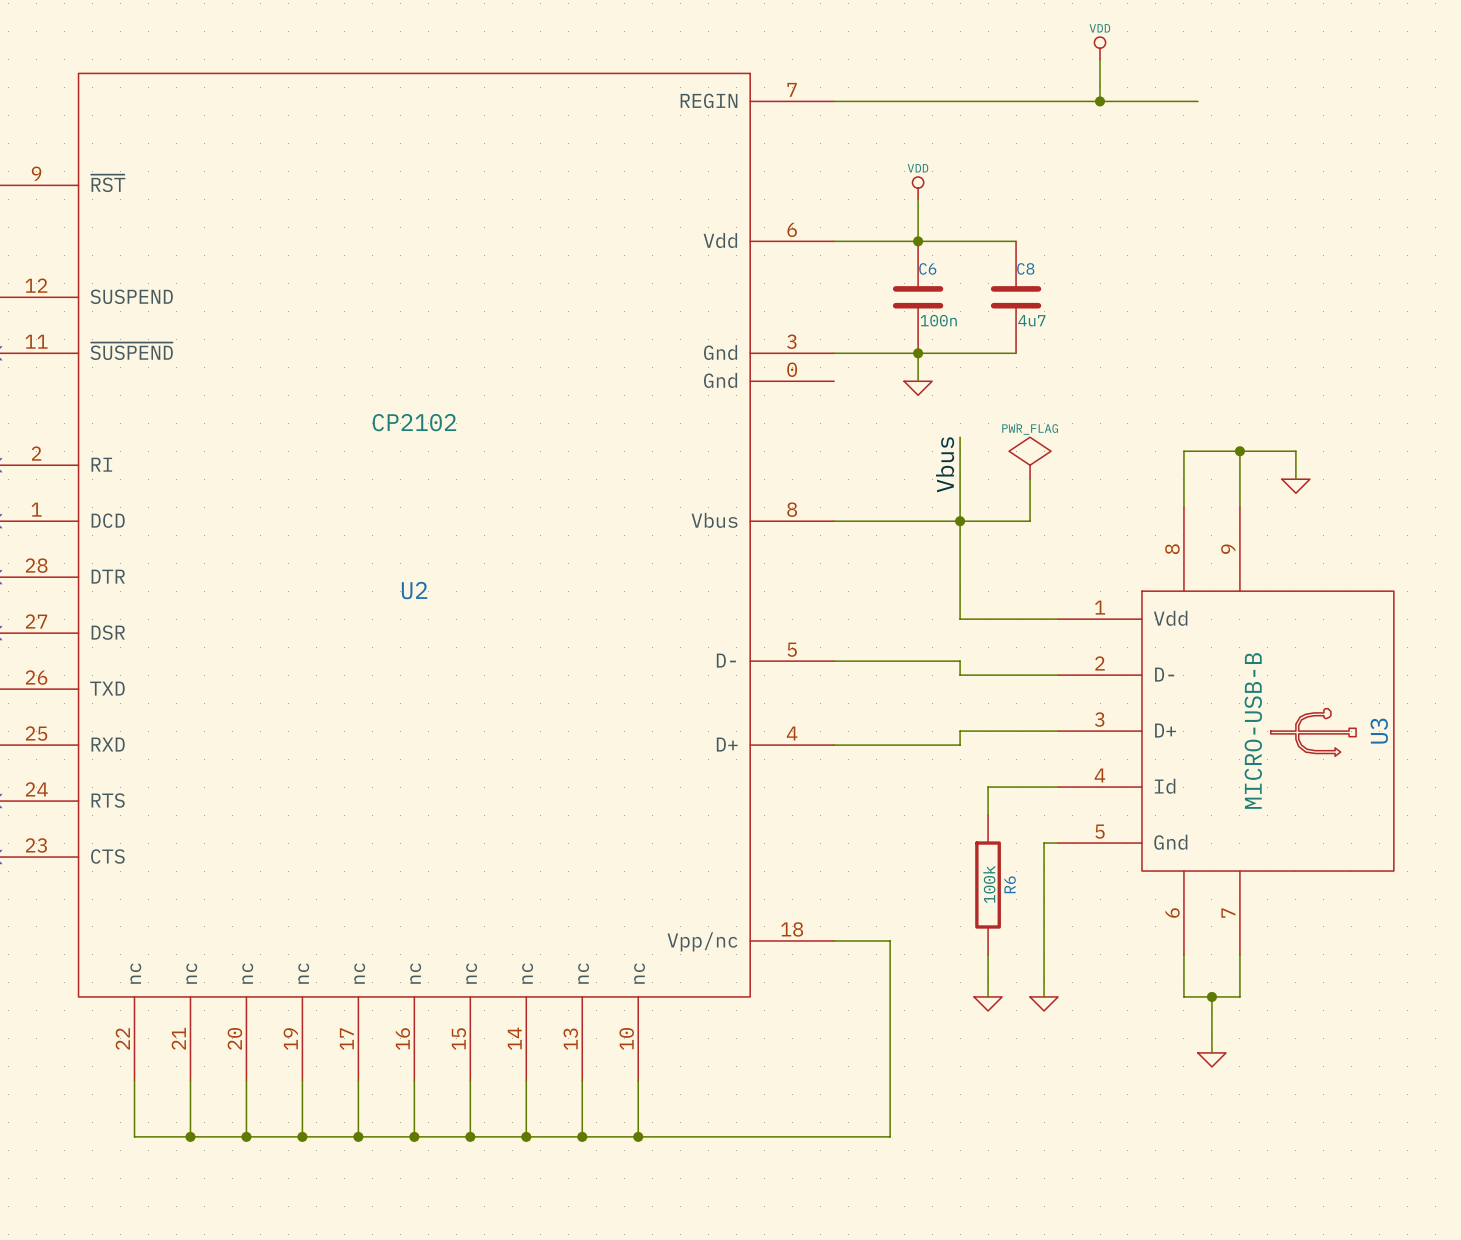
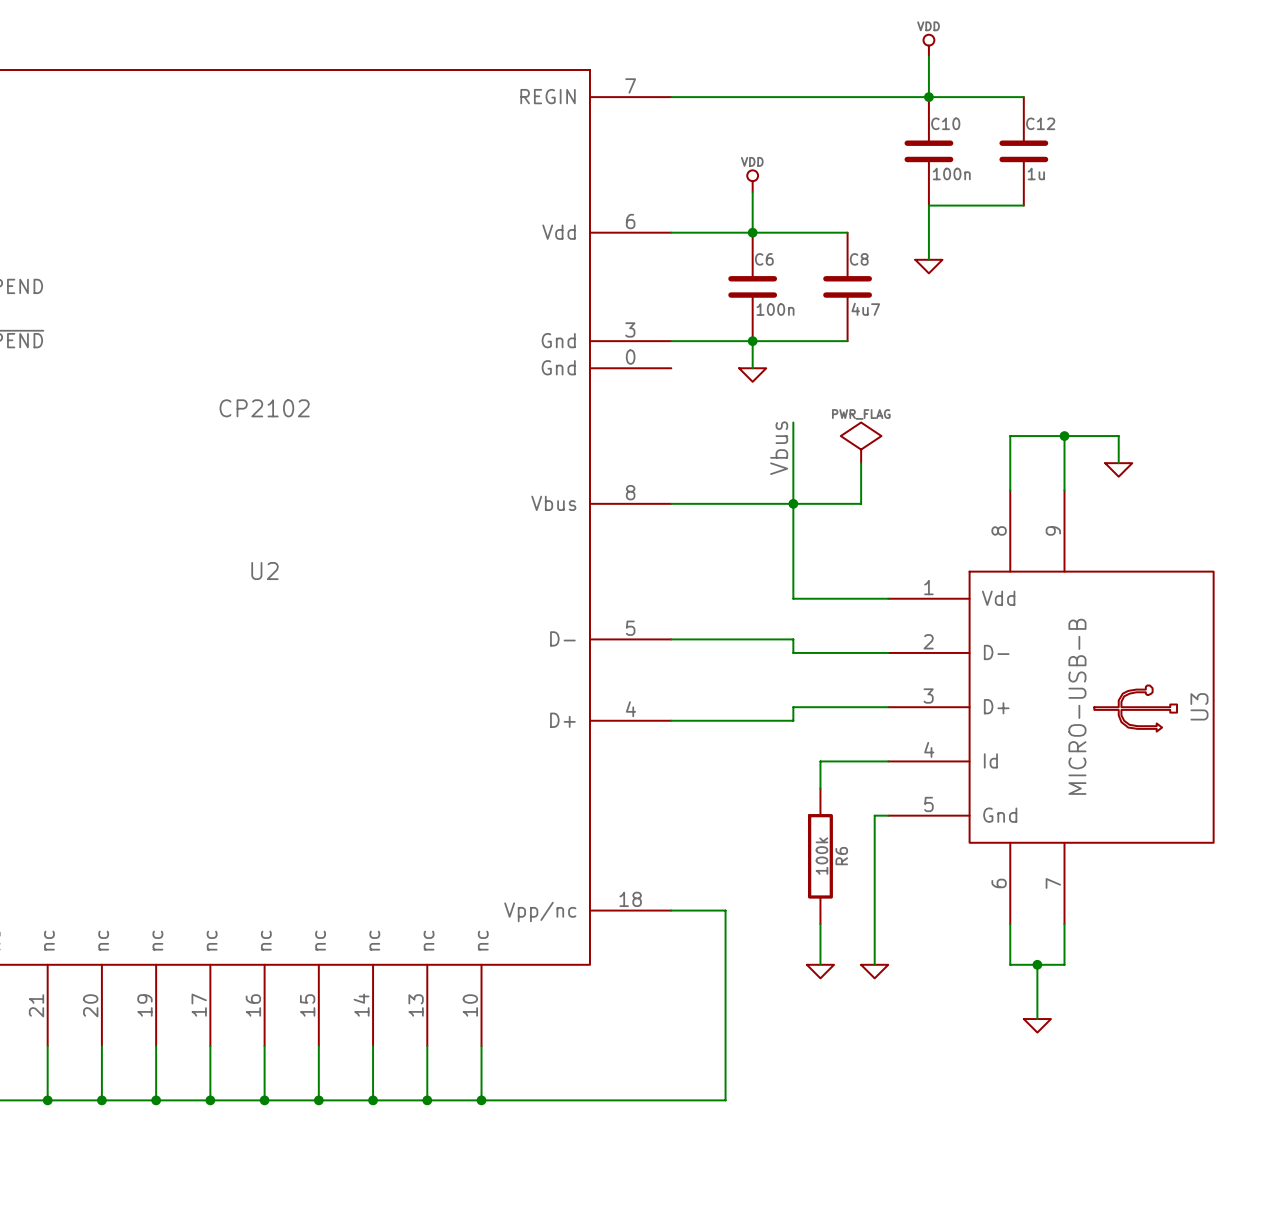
C10: none -> 100n (928, 151)
C12: none -> 1u (1023, 151)
wire: none -> (1023, 205) (928, 205) (928, 259)
power symbol: none -> (928, 266)

